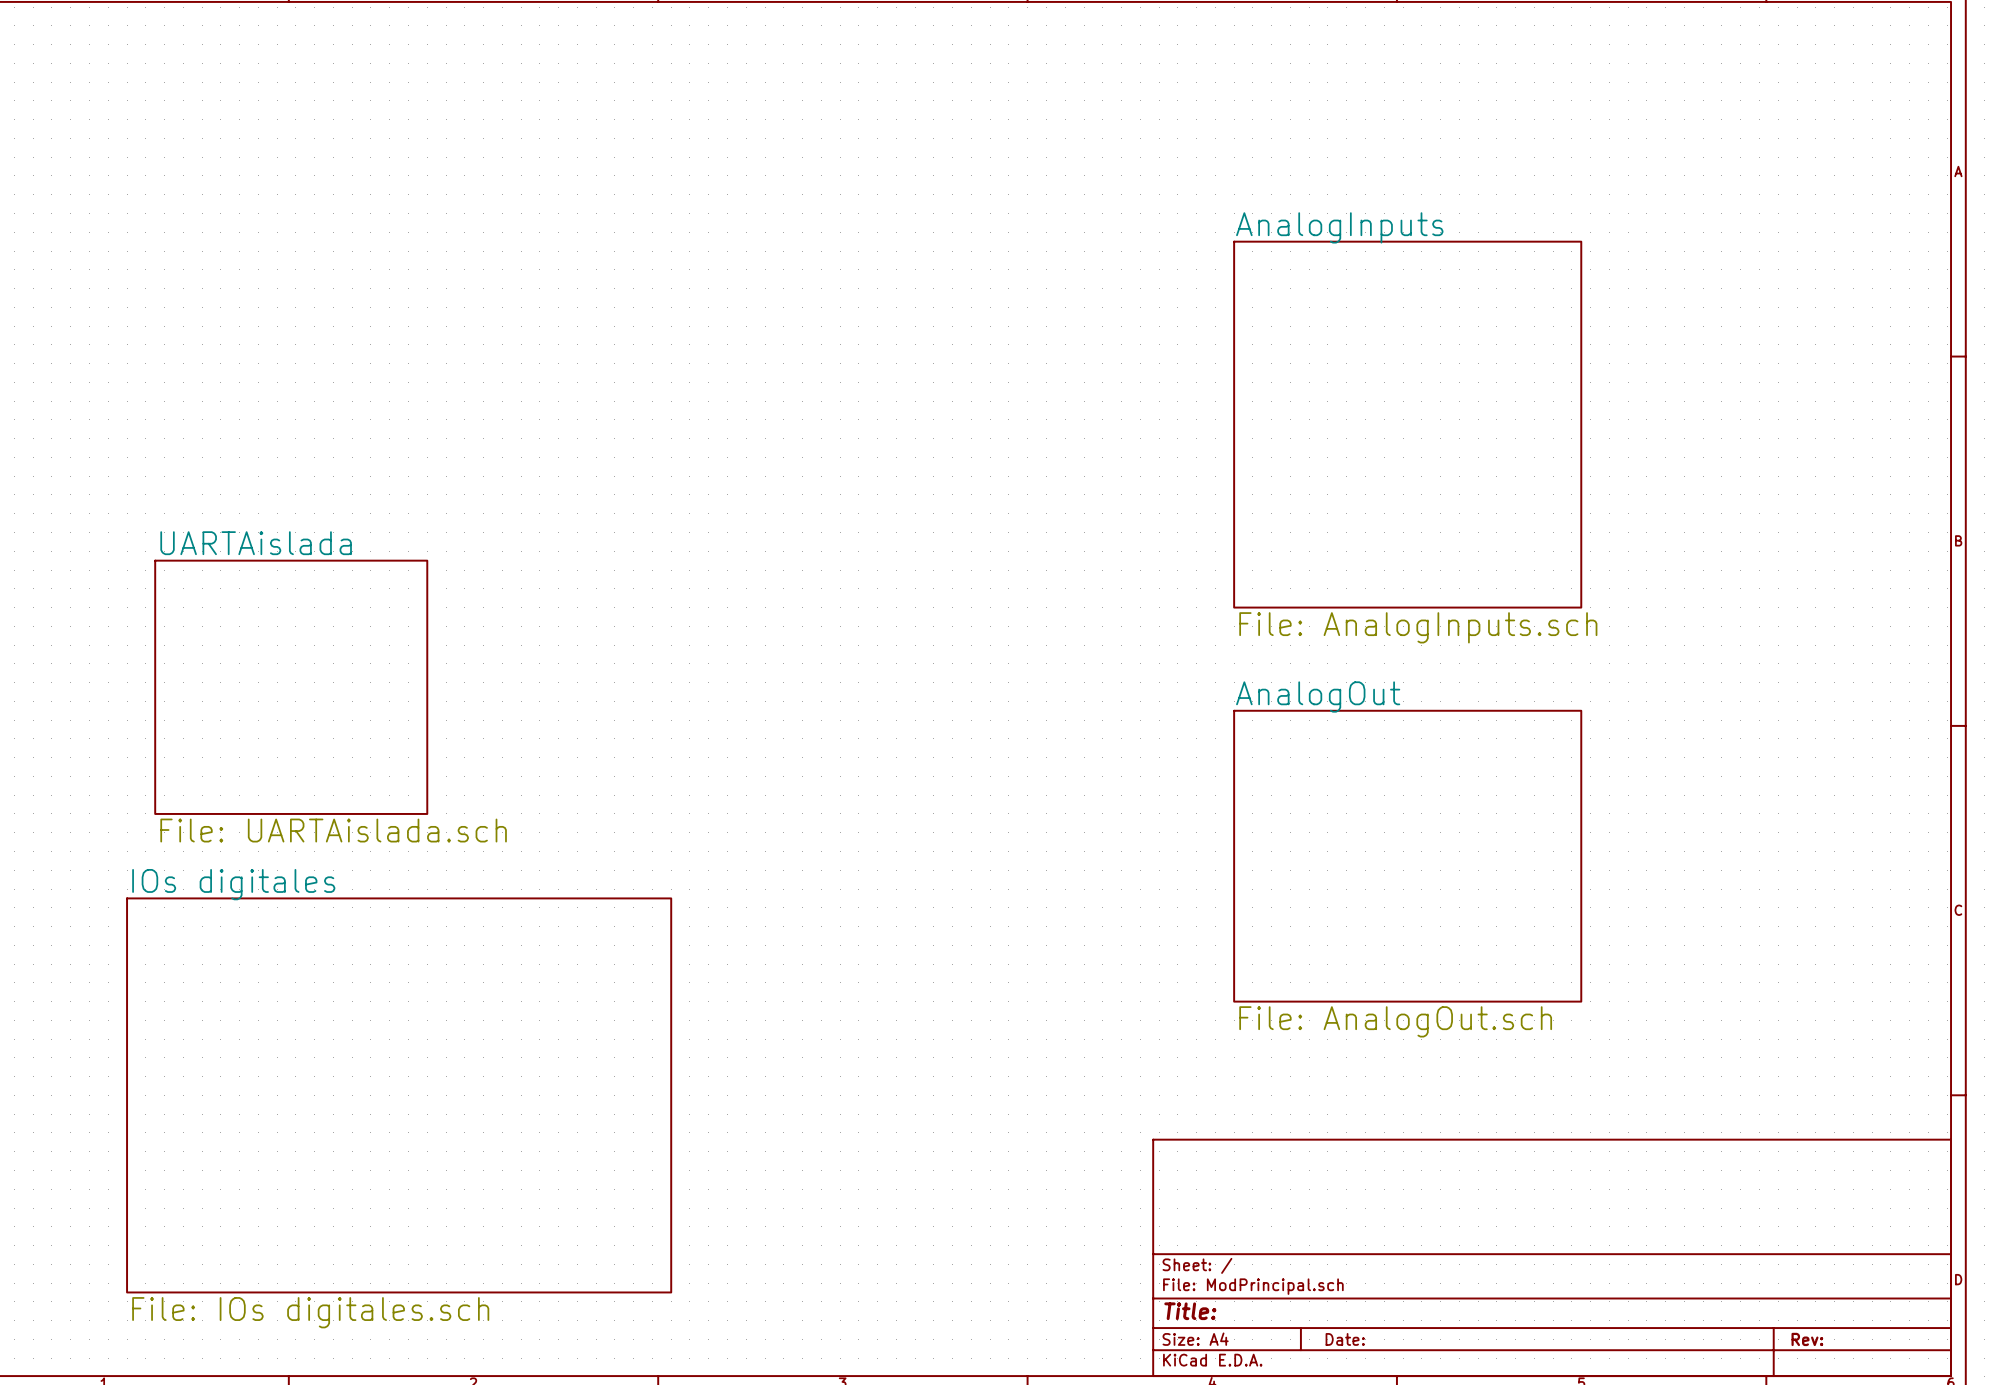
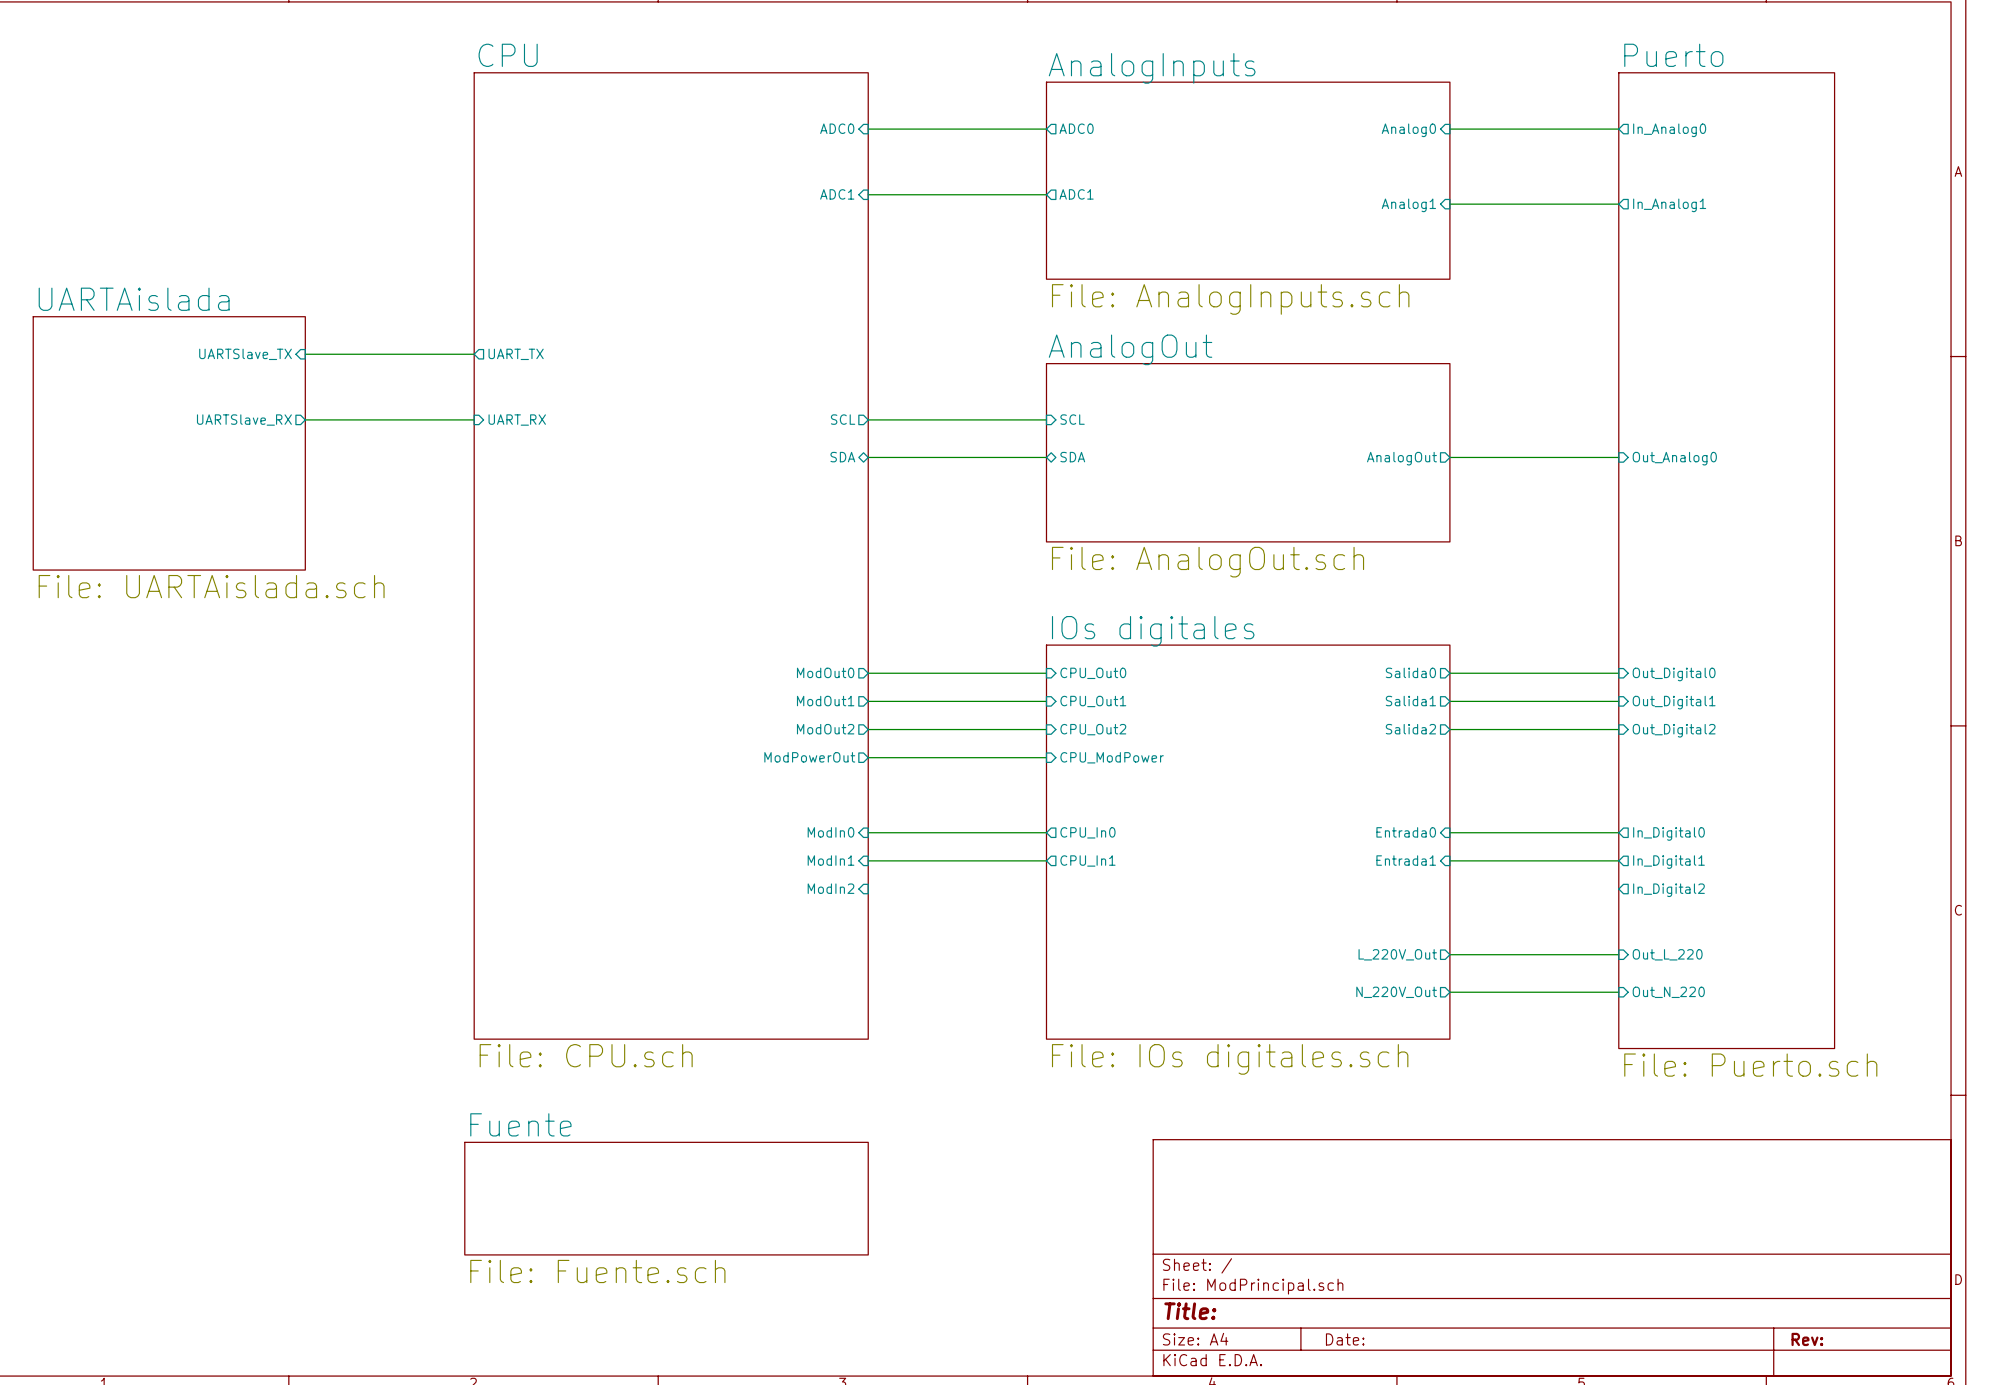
sheet pin: none -> ADC0 (837, 128)
sheet pin: none -> ADC0 (1076, 128)
wire: none -> (868, 129) (1046, 129)
wire: none -> (1449, 129) (1618, 129)
sheet pin: none -> Analog0 (1408, 130)
sheet pin: none -> In_Analog0 (1669, 130)
sheet AnalogInputs: none -> File: AnalogInputs.sch (1248, 180)
sheet pin: none -> ADC1 (837, 194)
wire: none -> (868, 194) (1046, 194)
sheet pin: none -> ADC1 (1076, 194)
wire: none -> (1449, 204) (1618, 204)
sheet pin: none -> Analog1 (1408, 205)
sheet pin: none -> In_Analog1 (1669, 205)
sheet pin: none -> UARTSlave_TX (245, 354)
wire: none -> (305, 354) (474, 354)
sheet pin: none -> UART_TX (516, 354)
wire: none -> (305, 419) (474, 419)
sheet pin: none -> SCL (843, 419)
wire: none -> (868, 419) (1046, 419)
sheet pin: none -> SCL (1072, 419)
sheet pin: none -> UARTSlave_RX (244, 420)
sheet pin: none -> UART_RX (517, 420)
sheet AnalogInputs: File: AnalogInputs.sch (1407, 424) -> none
sheet UARTAislada: none -> File: UARTAislada.sch (169, 443)
sheet AnalogOut: none -> File: AnalogOut.sch (1248, 452)
sheet pin: none -> SDA (842, 457)
wire: none -> (868, 457) (1046, 457)
sheet pin: none -> SDA (1072, 457)
wire: none -> (1449, 457) (1618, 457)
sheet pin: none -> AnalogOut (1401, 458)
sheet pin: none -> Out_Analog0 (1674, 458)
sheet CPU: none -> File: CPU.sch (671, 555)
sheet Puerto: none -> File: Puerto.sch (1726, 560)
sheet pin: none -> ModOut0 (825, 672)
sheet pin: none -> Salida0 (1410, 672)
wire: none -> (868, 673) (1046, 673)
sheet pin: none -> CPU_Out0 (1093, 673)
wire: none -> (1449, 673) (1618, 673)
sheet pin: none -> Out_Digital0 (1674, 674)
sheet UARTAislada: File: UARTAislada.sch (291, 687) -> none
sheet pin: none -> ModOut1 (825, 701)
wire: none -> (868, 701) (1046, 701)
sheet pin: none -> CPU_Out1 (1093, 701)
sheet pin: none -> Salida1 (1410, 701)
wire: none -> (1449, 701) (1618, 701)
sheet pin: none -> Out_Digital1 (1674, 702)
sheet pin: none -> ModOut2 (825, 729)
wire: none -> (868, 729) (1046, 729)
sheet pin: none -> CPU_Out2 (1093, 729)
sheet pin: none -> Salida2 (1410, 729)
wire: none -> (1449, 729) (1618, 729)
sheet pin: none -> Out_Digital2 (1674, 730)
sheet pin: none -> ModPowerOut (809, 757)
wire: none -> (868, 757) (1046, 757)
sheet pin: none -> CPU_ModPower (1112, 757)
sheet pin: none -> ModIn0 (831, 832)
wire: none -> (868, 832) (1046, 832)
sheet pin: none -> CPU_In0 (1087, 832)
sheet pin: none -> Entrada0 (1406, 832)
wire: none -> (1449, 832) (1618, 832)
sheet pin: none -> In_Digital0 (1668, 833)
sheet IOs digitales: none -> File: IOs digitales.sch (1248, 842)
sheet AnalogOut: File: AnalogOut.sch (1407, 856) -> none
sheet pin: none -> ModIn1 (831, 860)
wire: none -> (868, 860) (1046, 860)
sheet pin: none -> CPU_In1 (1087, 860)
sheet pin: none -> Entrada1 (1406, 860)
wire: none -> (1449, 860) (1618, 860)
sheet pin: none -> In_Digital1 (1668, 862)
sheet pin: none -> ModIn2 (831, 888)
sheet pin: none -> In_Digital2 (1668, 890)
sheet pin: none -> L_220V_Out (1397, 954)
wire: none -> (1449, 954) (1618, 954)
sheet pin: none -> Out_L_220 (1667, 954)
sheet pin: none -> N_220V_Out (1396, 992)
wire: none -> (1449, 992) (1618, 992)
sheet pin: none -> Out_N_220 (1668, 992)
sheet IOs digitales: File: IOs digitales.sch (399, 1095) -> none
sheet Fuente: none -> File: Fuente.sch (666, 1198)

